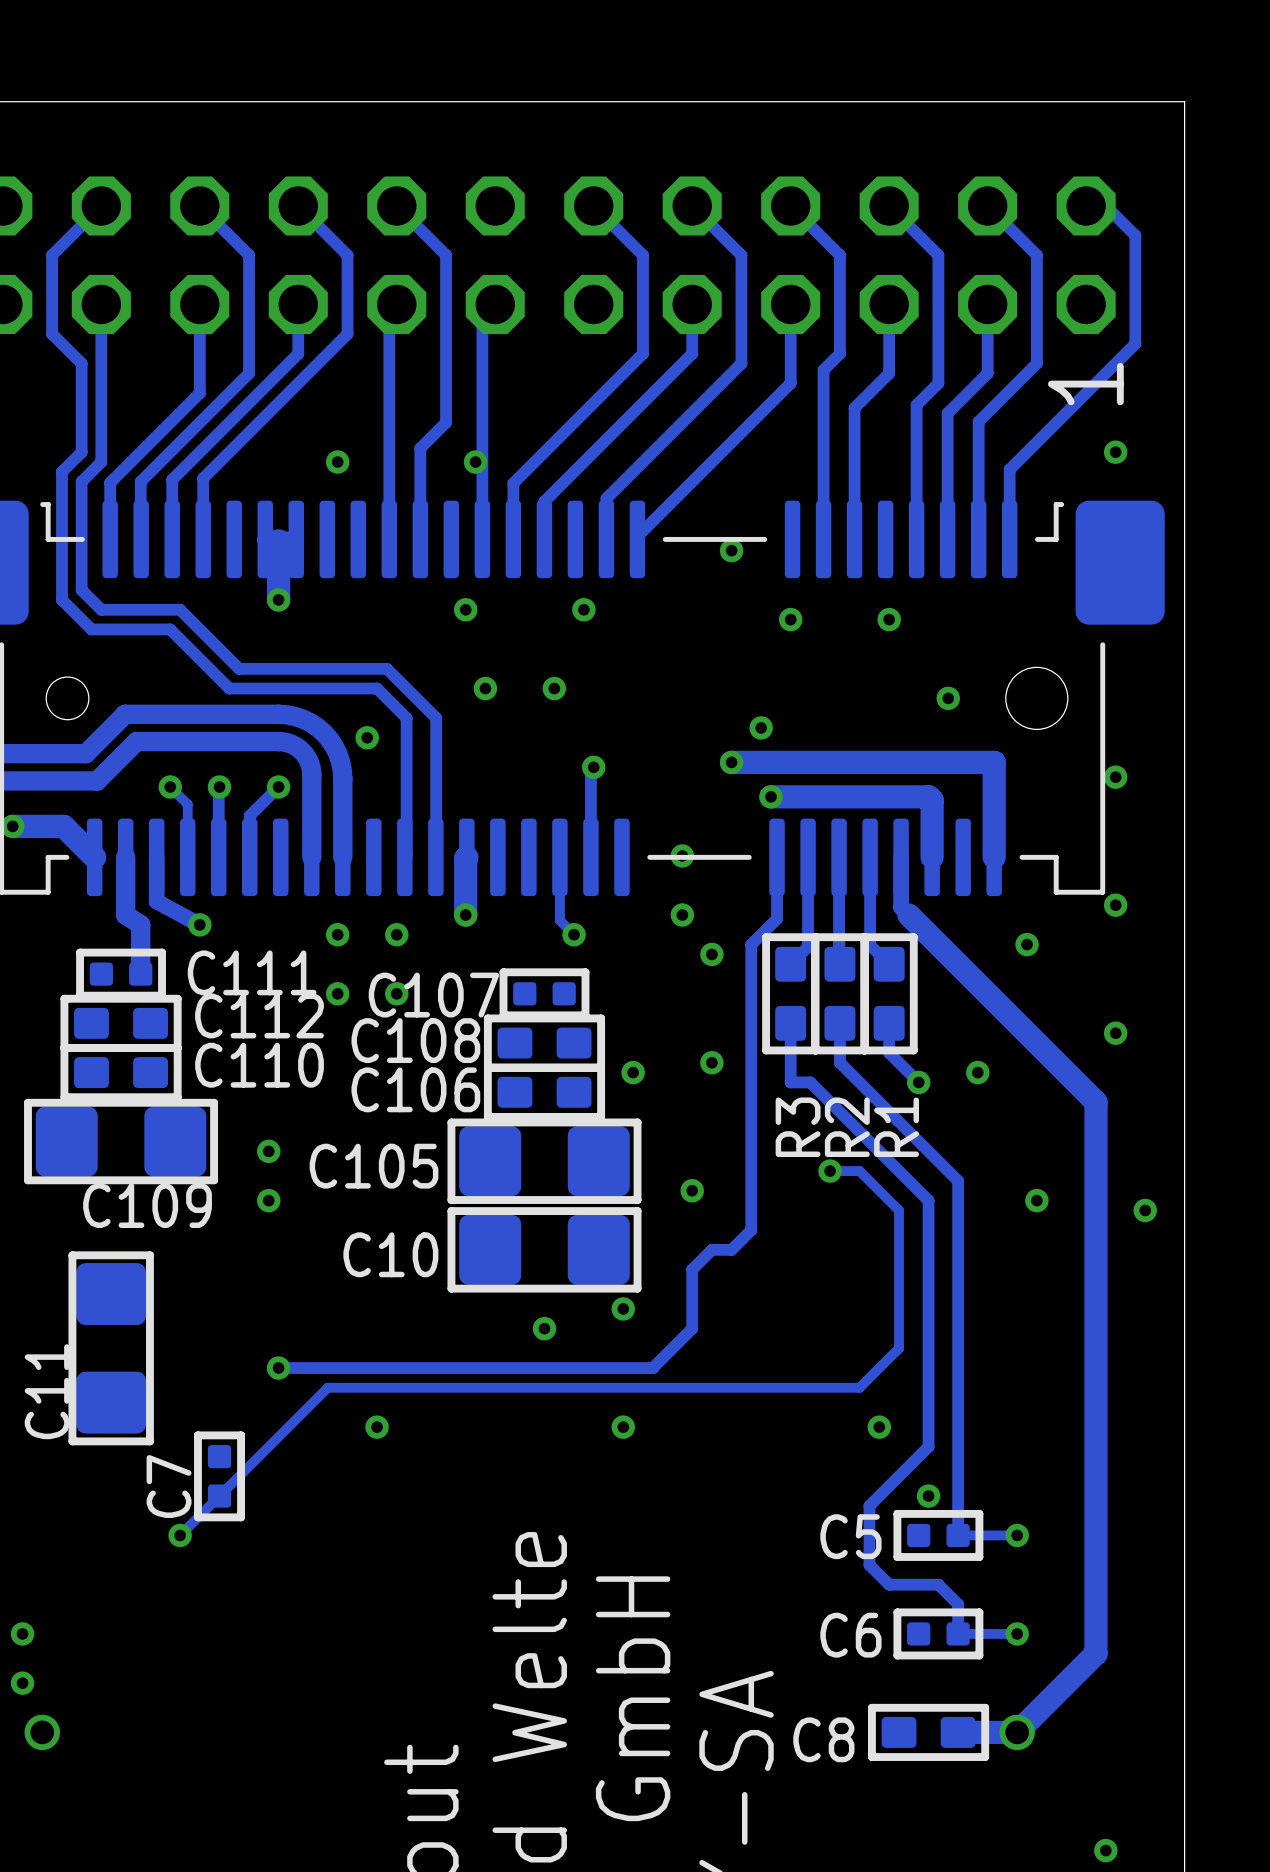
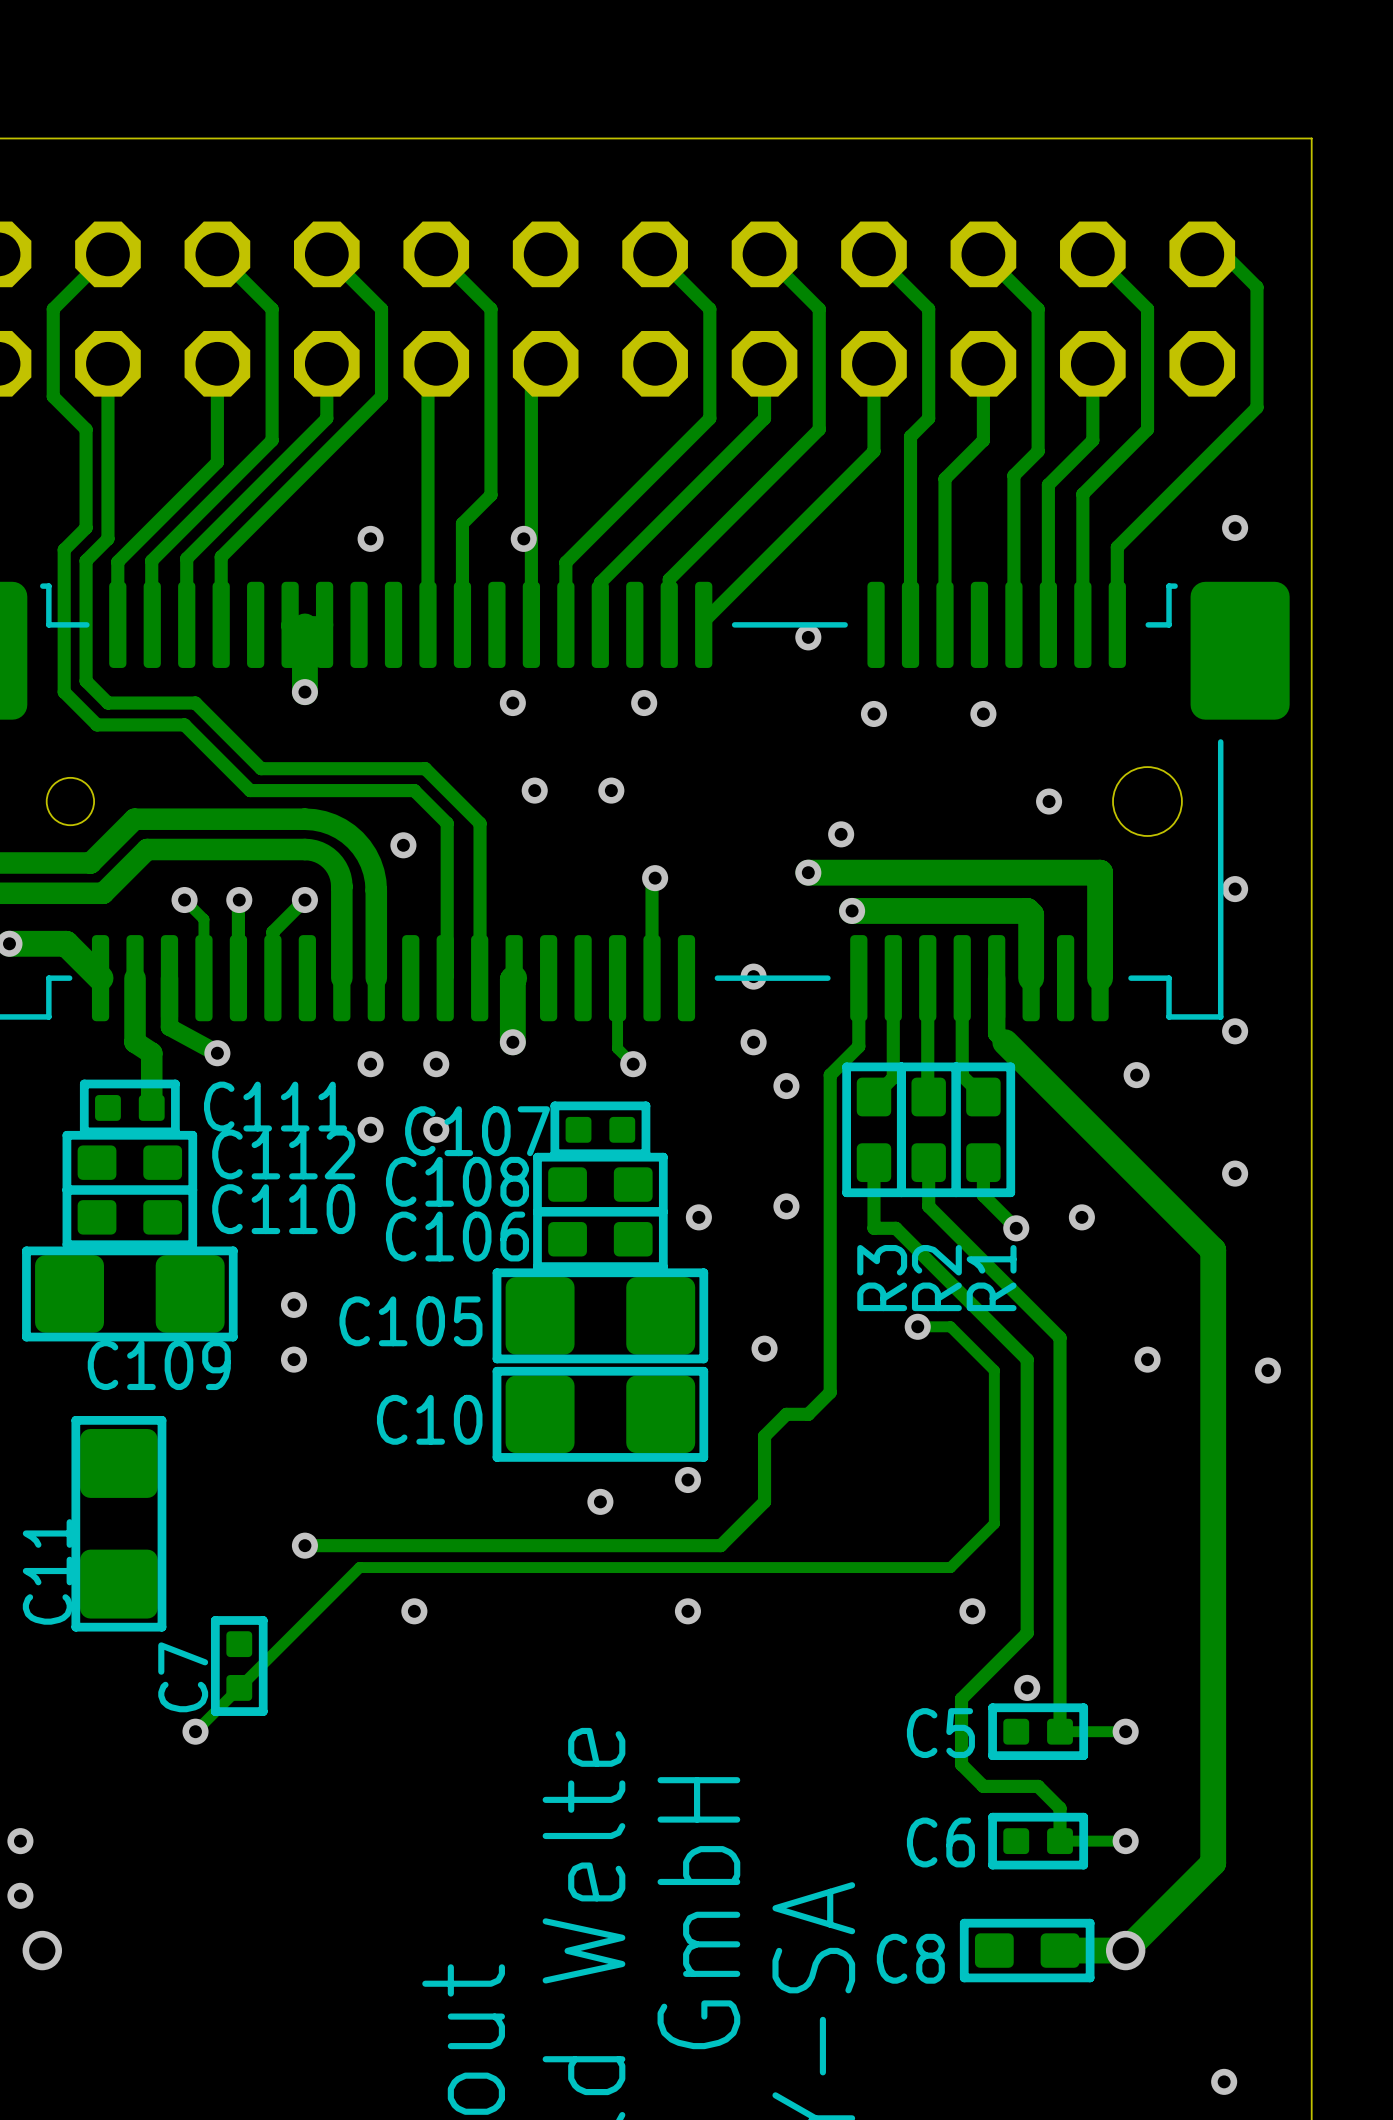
text: 1 (1085, 384) -> none

